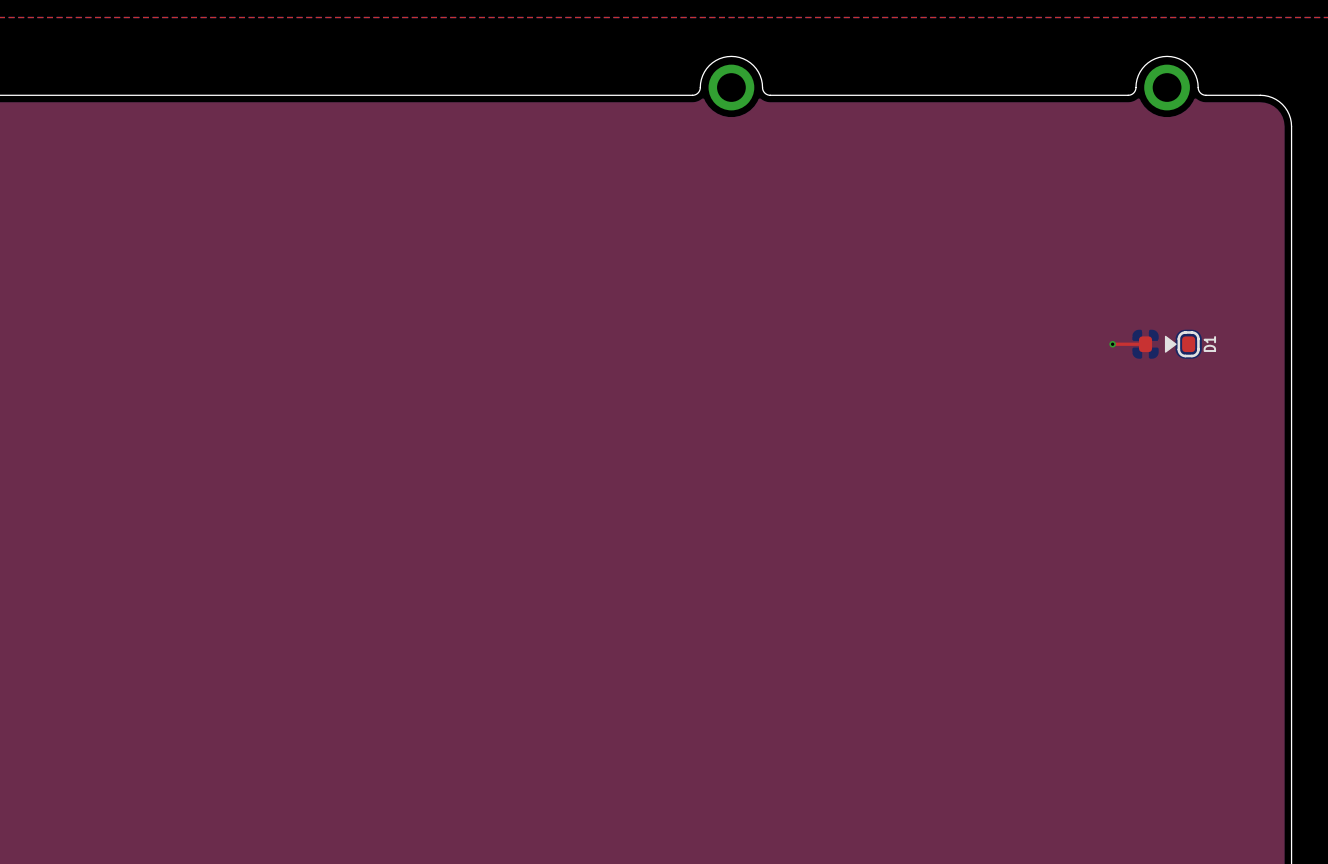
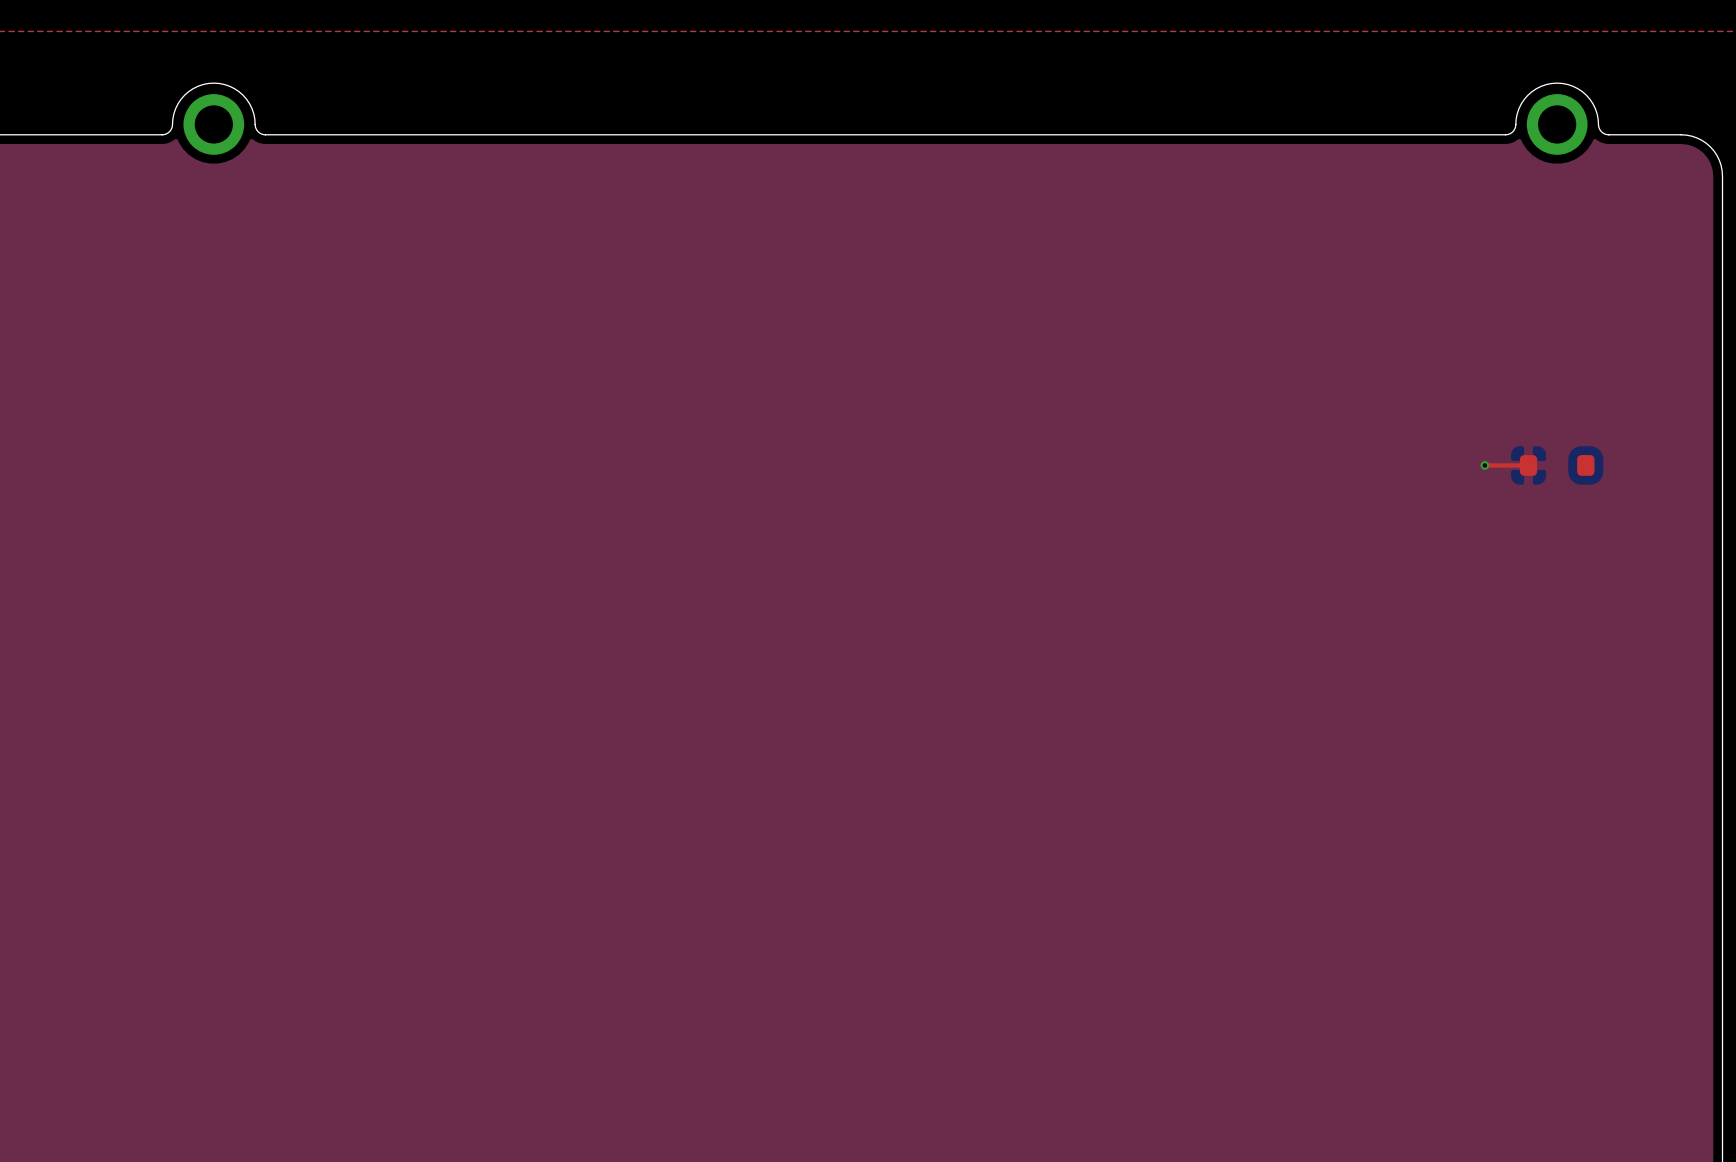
part: none -> (213, 124)
part: (731, 87) -> none
board edge: (116, 95) (194, 95) -> (162, 134) (171, 129) (175, 108) (184, 95) (198, 86) (213, 83) (229, 86) (243, 95) (252, 108) (256, 129) (265, 134)
board edge: (692, 95) (699, 91) (702, 75) (709, 65) (719, 58) (731, 56) (743, 58) (753, 65) (760, 75) (763, 91) (770, 95) -> (926, 134) (1030, 134)
part: none -> (1557, 465)
D1: (1169, 344) -> none

